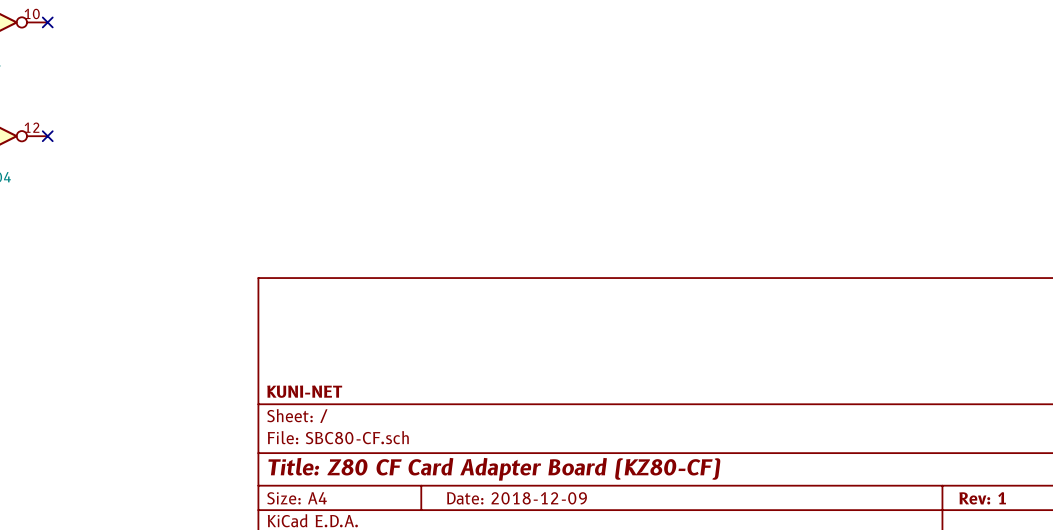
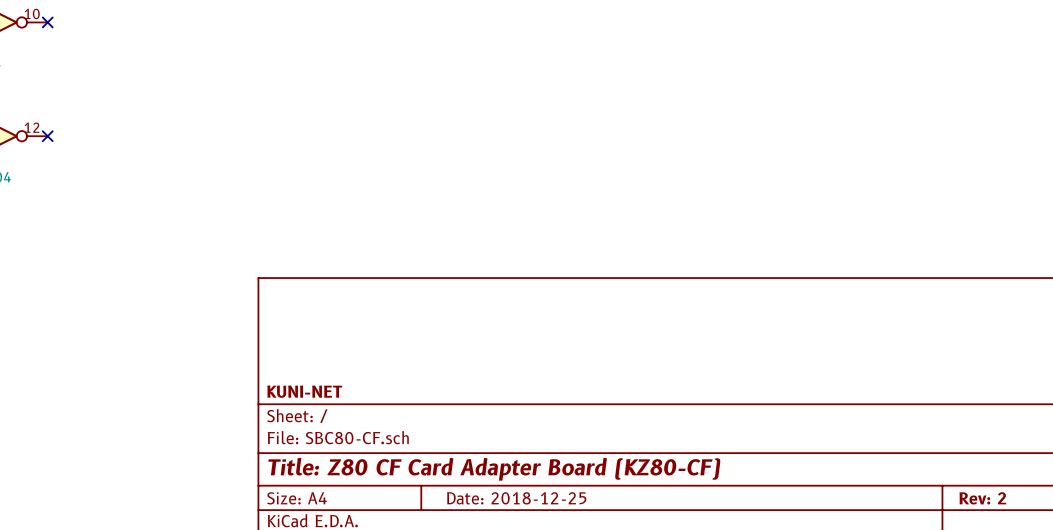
title block: Date: 2018-12-09 (517, 498) -> Date: 2018-12-25 (516, 498)
title block: Rev: 1 (982, 498) -> Rev: 2 (982, 498)

